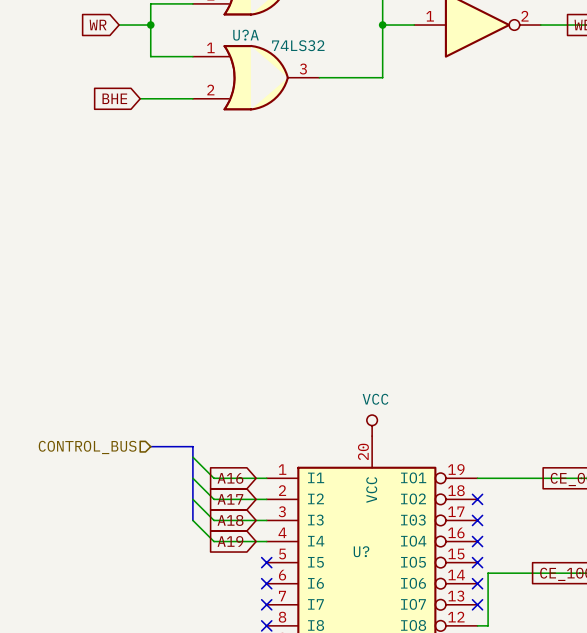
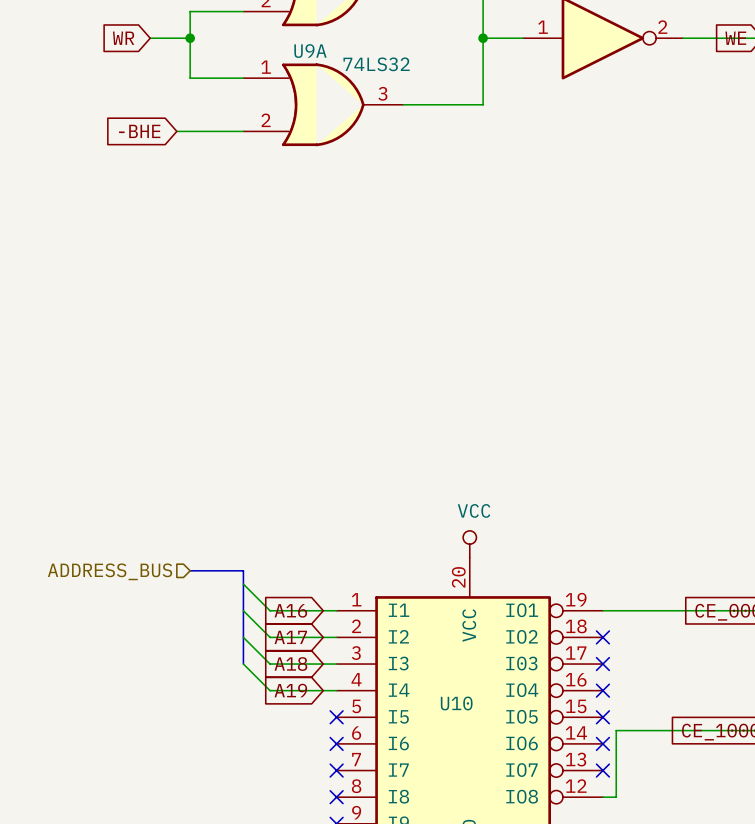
U?A name: U?A (246, 35) -> U9A (310, 51)
global label: BHE (114, 98) -> -BHE (139, 131)
hierarchical label: CONTROL_BUS (87, 447) -> ADDRESS_BUS (110, 571)
U? name: U? (361, 551) -> U10 (456, 703)

